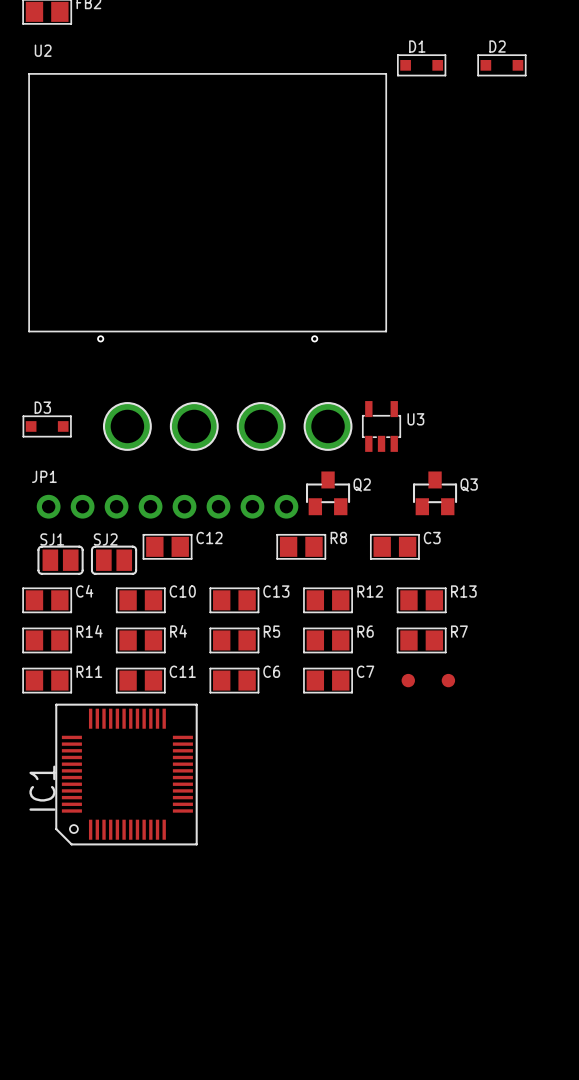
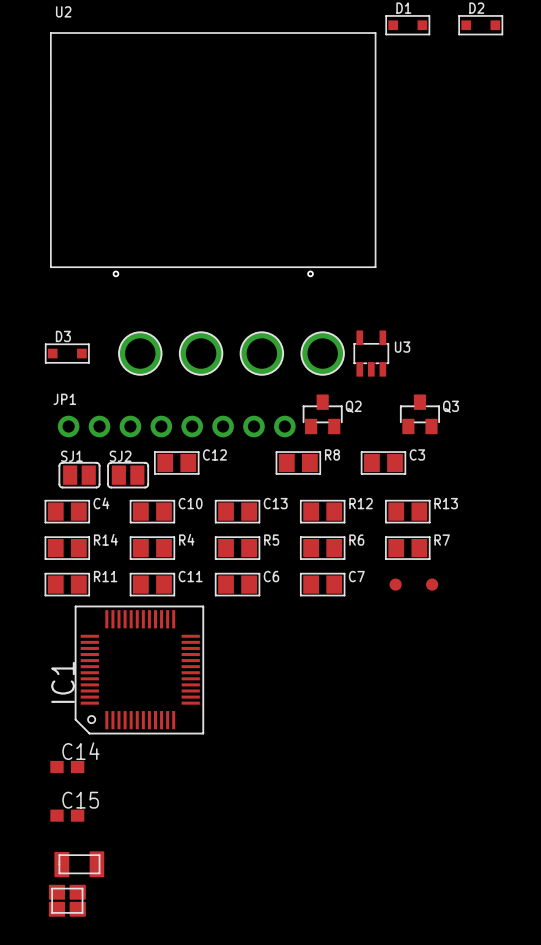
C14: none -> (67, 766)
C15: none -> (67, 815)
part: none -> (79, 864)
part: none -> (67, 900)

